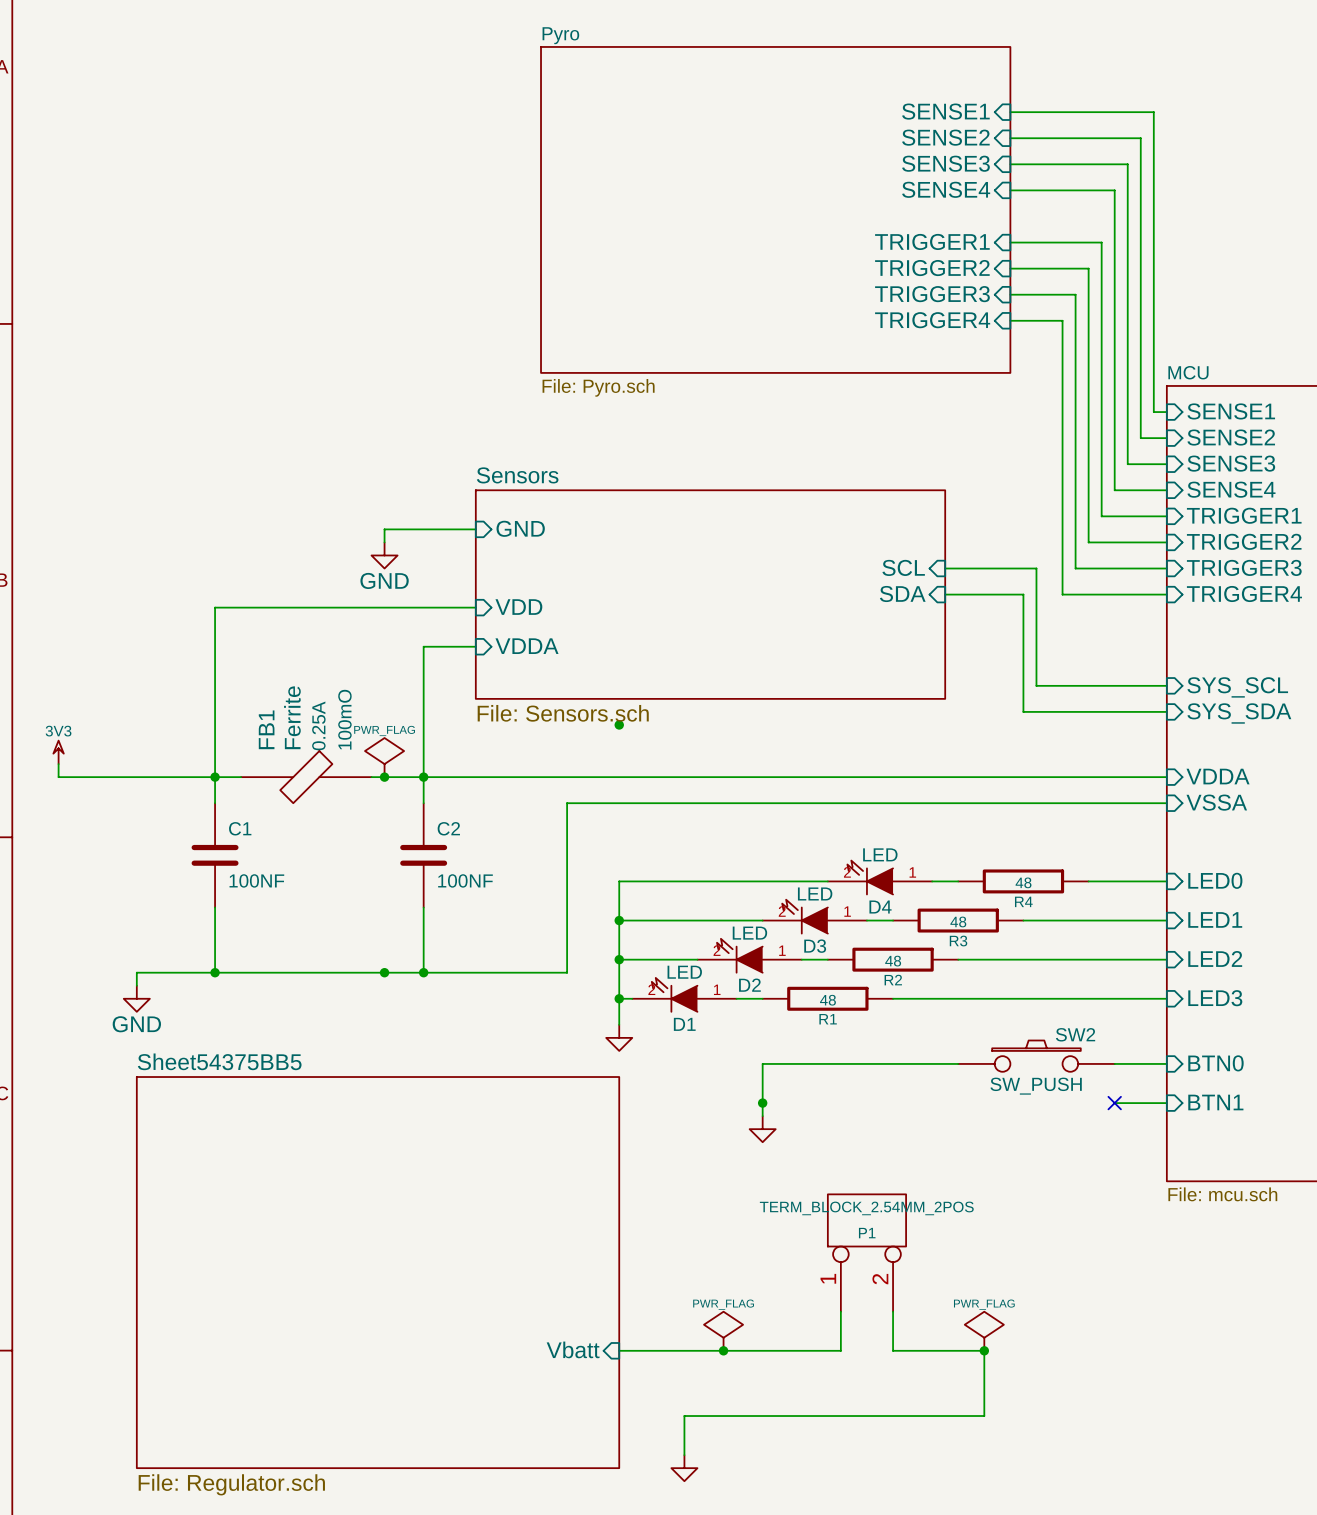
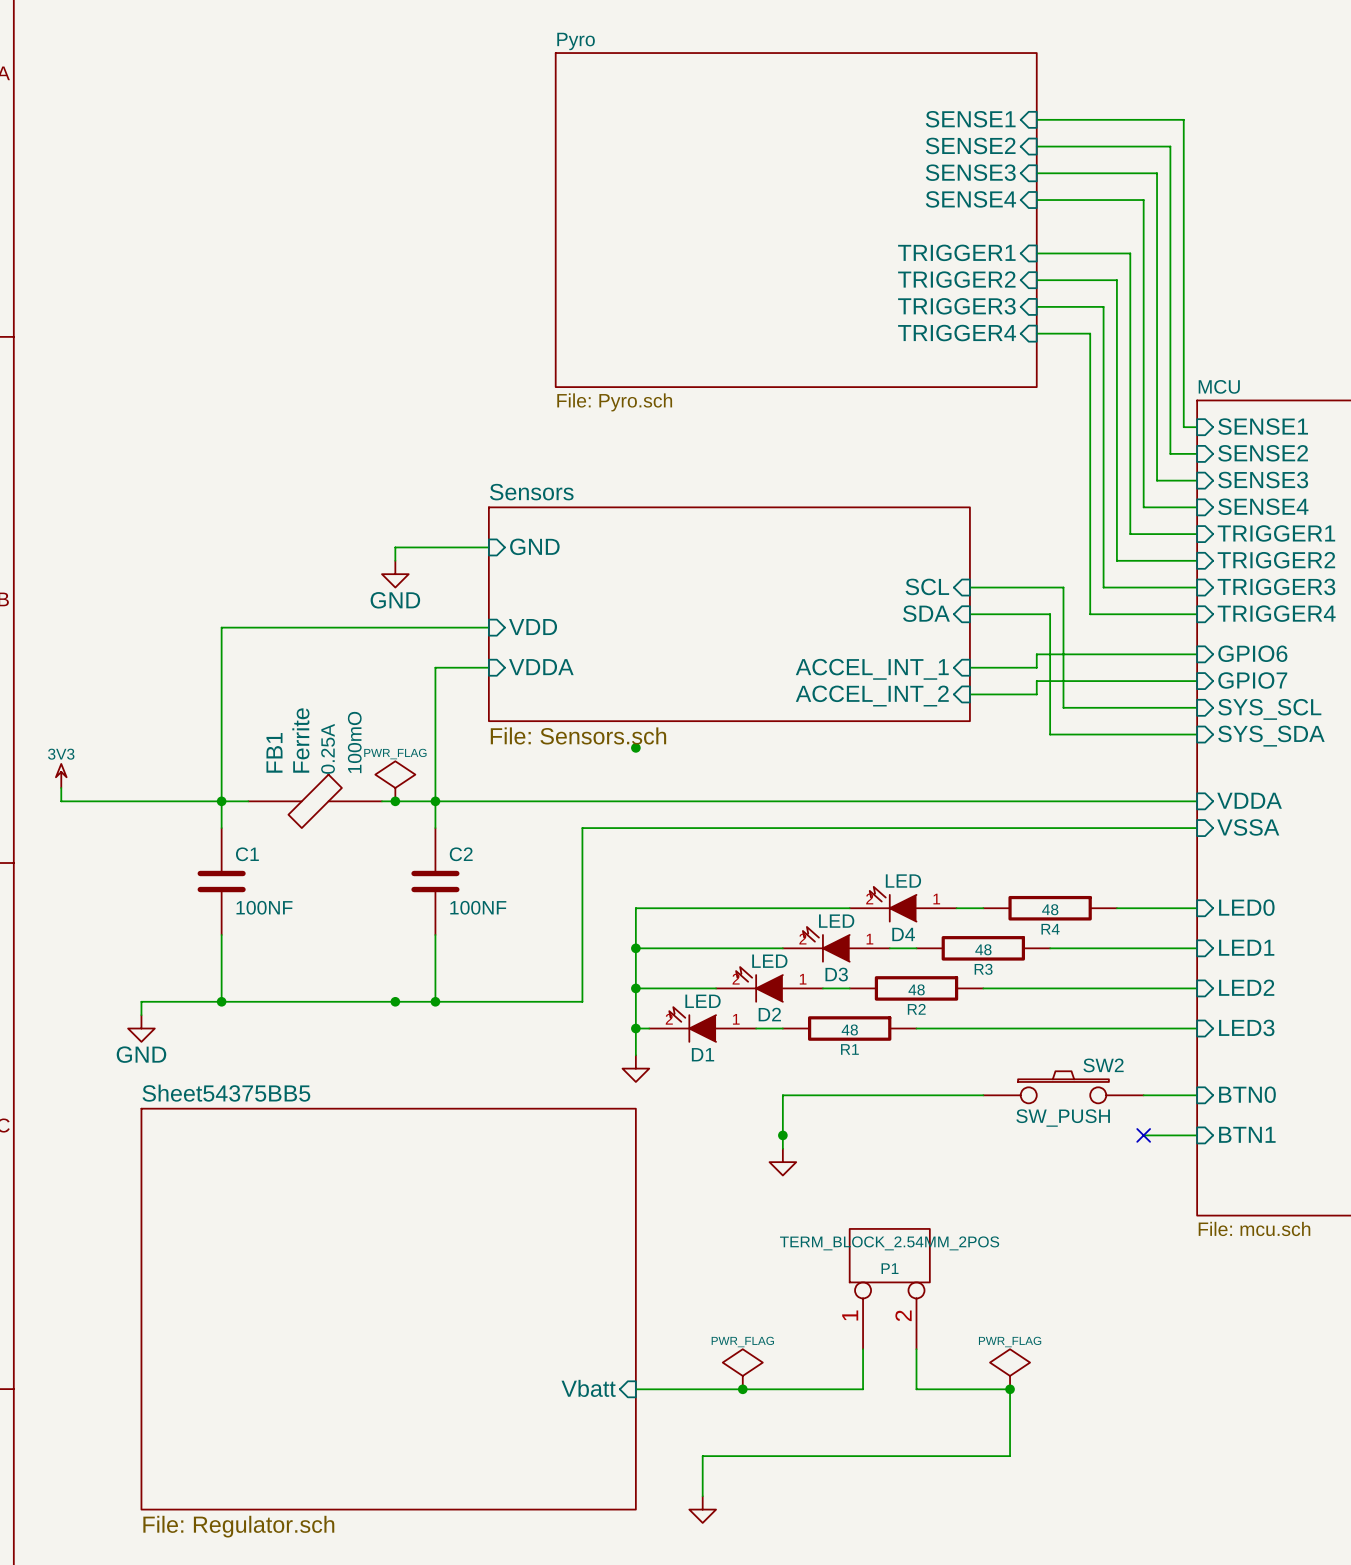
wire: none -> (1197, 654) (1036, 654) (1036, 667) (969, 667)
sheet pin: none -> GPIO6 (1252, 653)
sheet pin: none -> ACCEL_INT_1 (872, 669)
wire: none -> (1197, 681) (1036, 681) (1036, 694) (969, 694)
sheet pin: none -> GPIO7 (1252, 680)
sheet pin: none -> ACCEL_INT_2 (872, 696)

